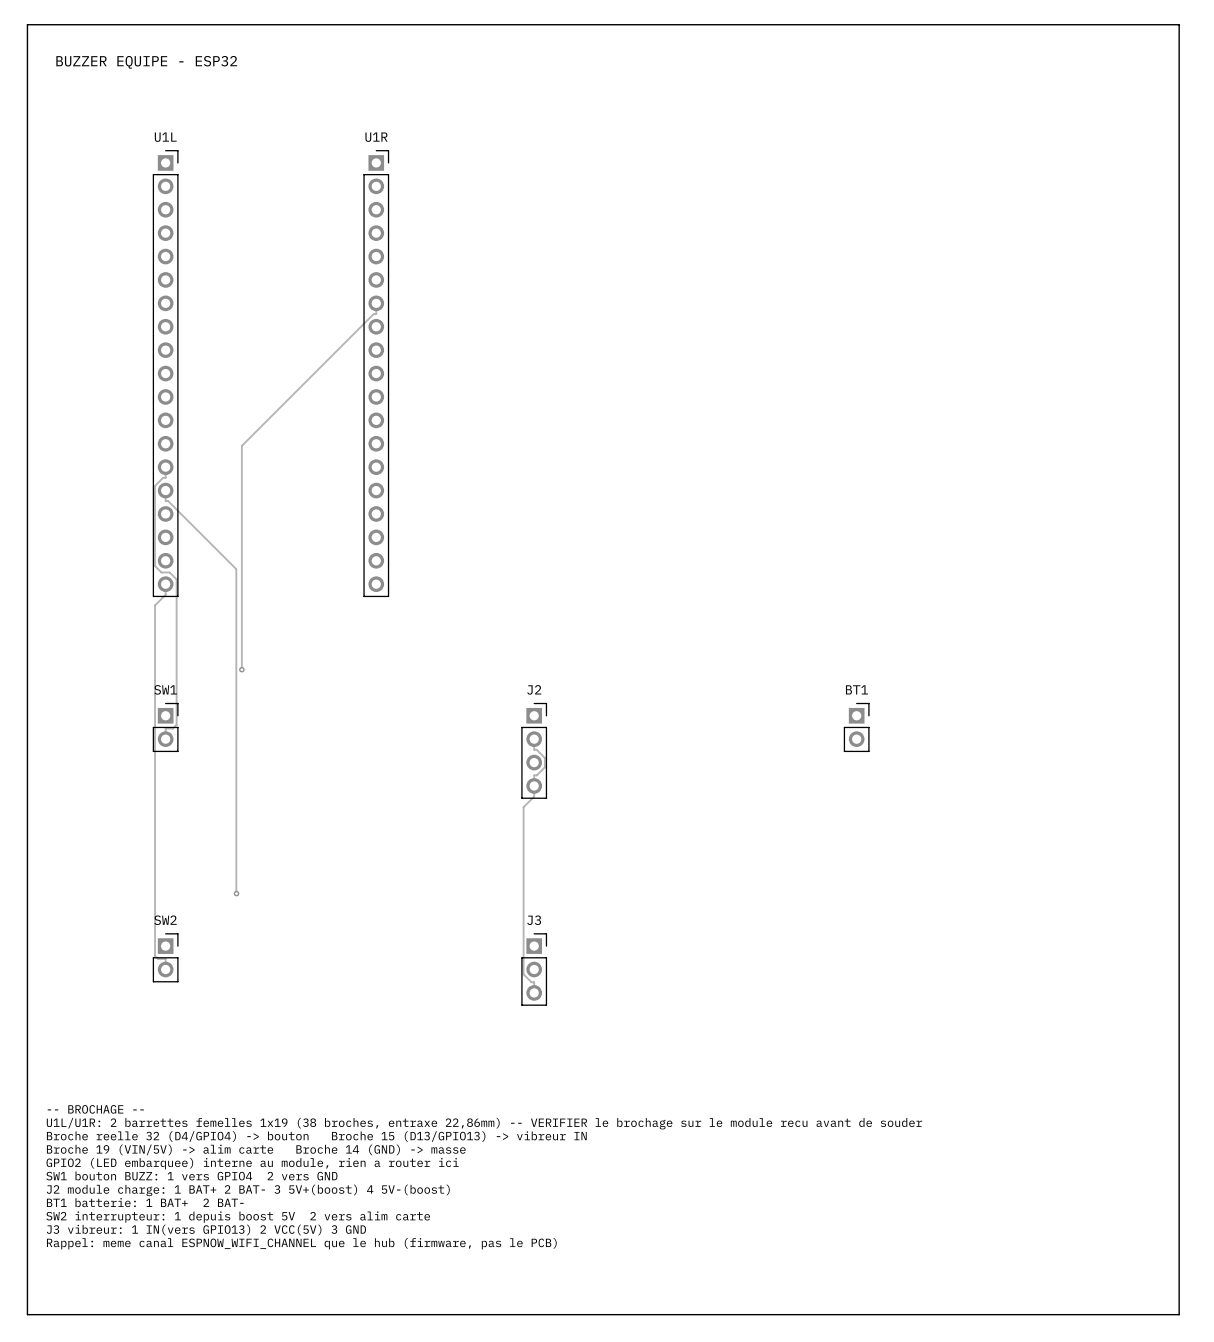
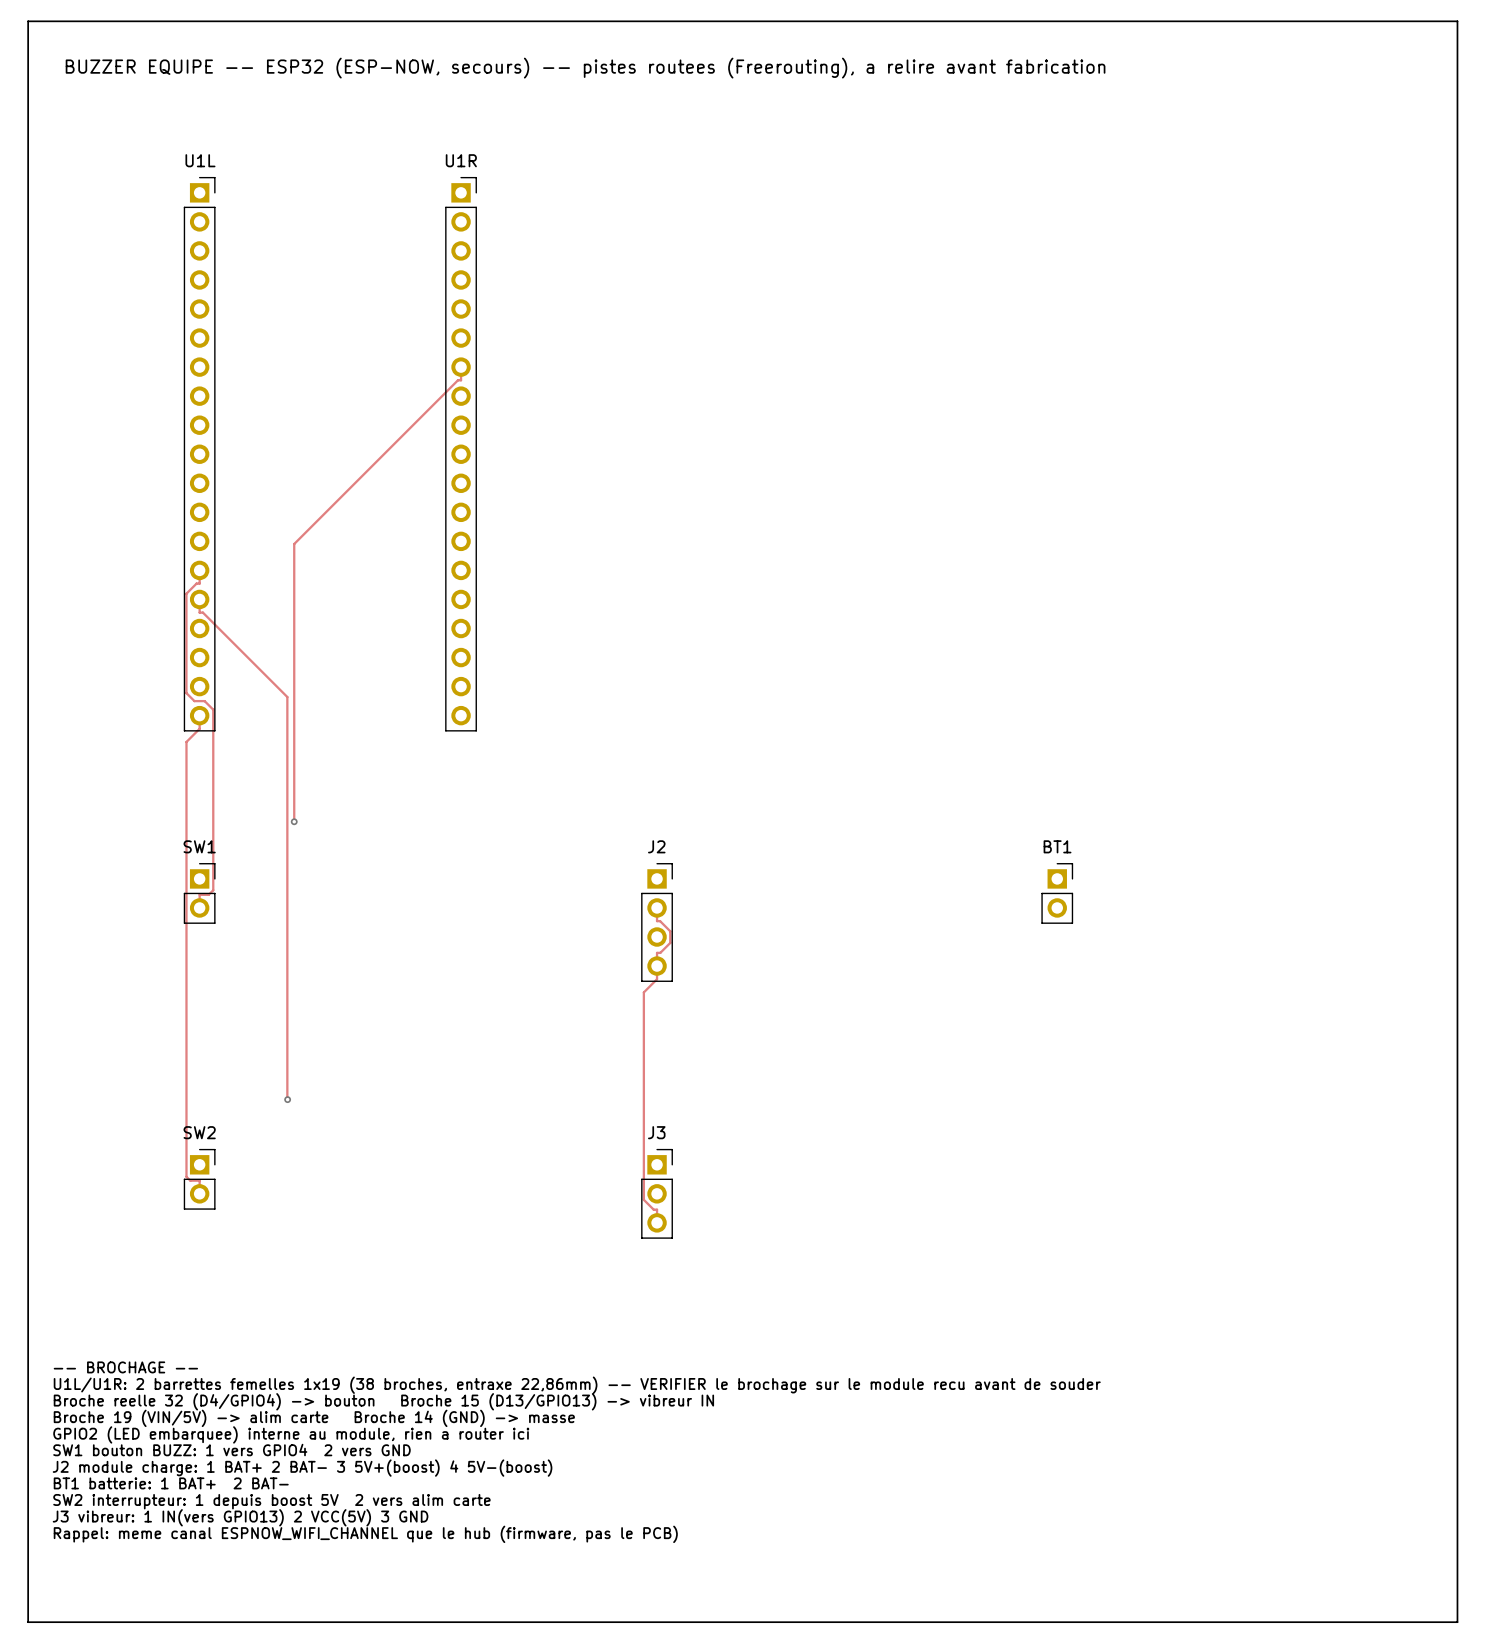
text: BUZZER EQUIPE - ESP32 (146, 62) -> BUZZER EQUIPE -- ESP32 (ESP-NOW, secours) -- pistes routees (Freerouting), a relire avant fabrication (585, 68)

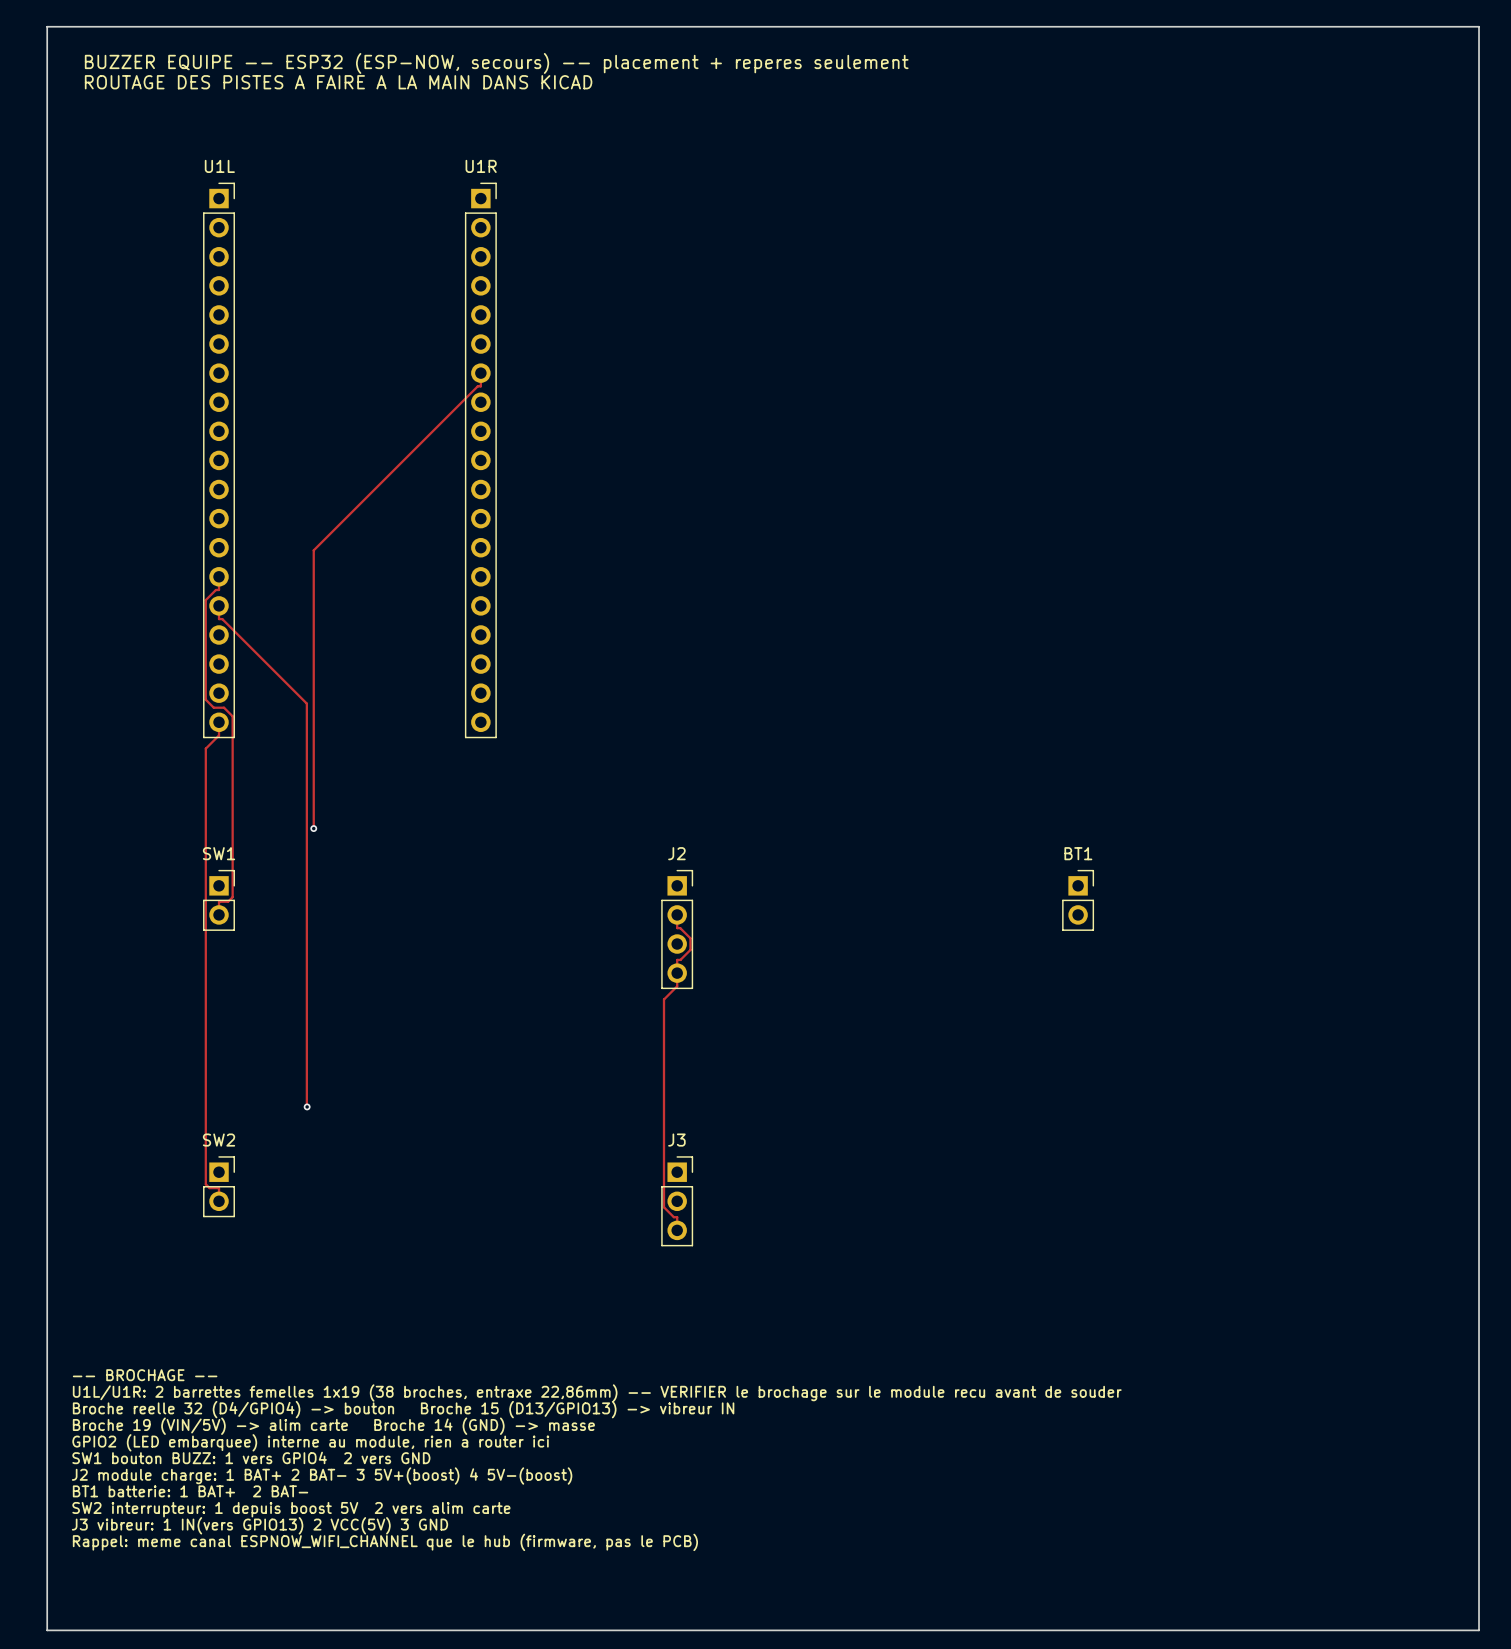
text: BUZZER EQUIPE -- ESP32 (ESP-NOW, secours) -- pistes routees (Freerouting), a relire avant fabrication (585, 68) -> BUZZER EQUIPE -- ESP32 (ESP-NOW, secours) -- placement + reperes seulement (496, 63)
text: none -> ROUTAGE DES PISTES A FAIRE A LA MAIN DANS KICAD (338, 82)

